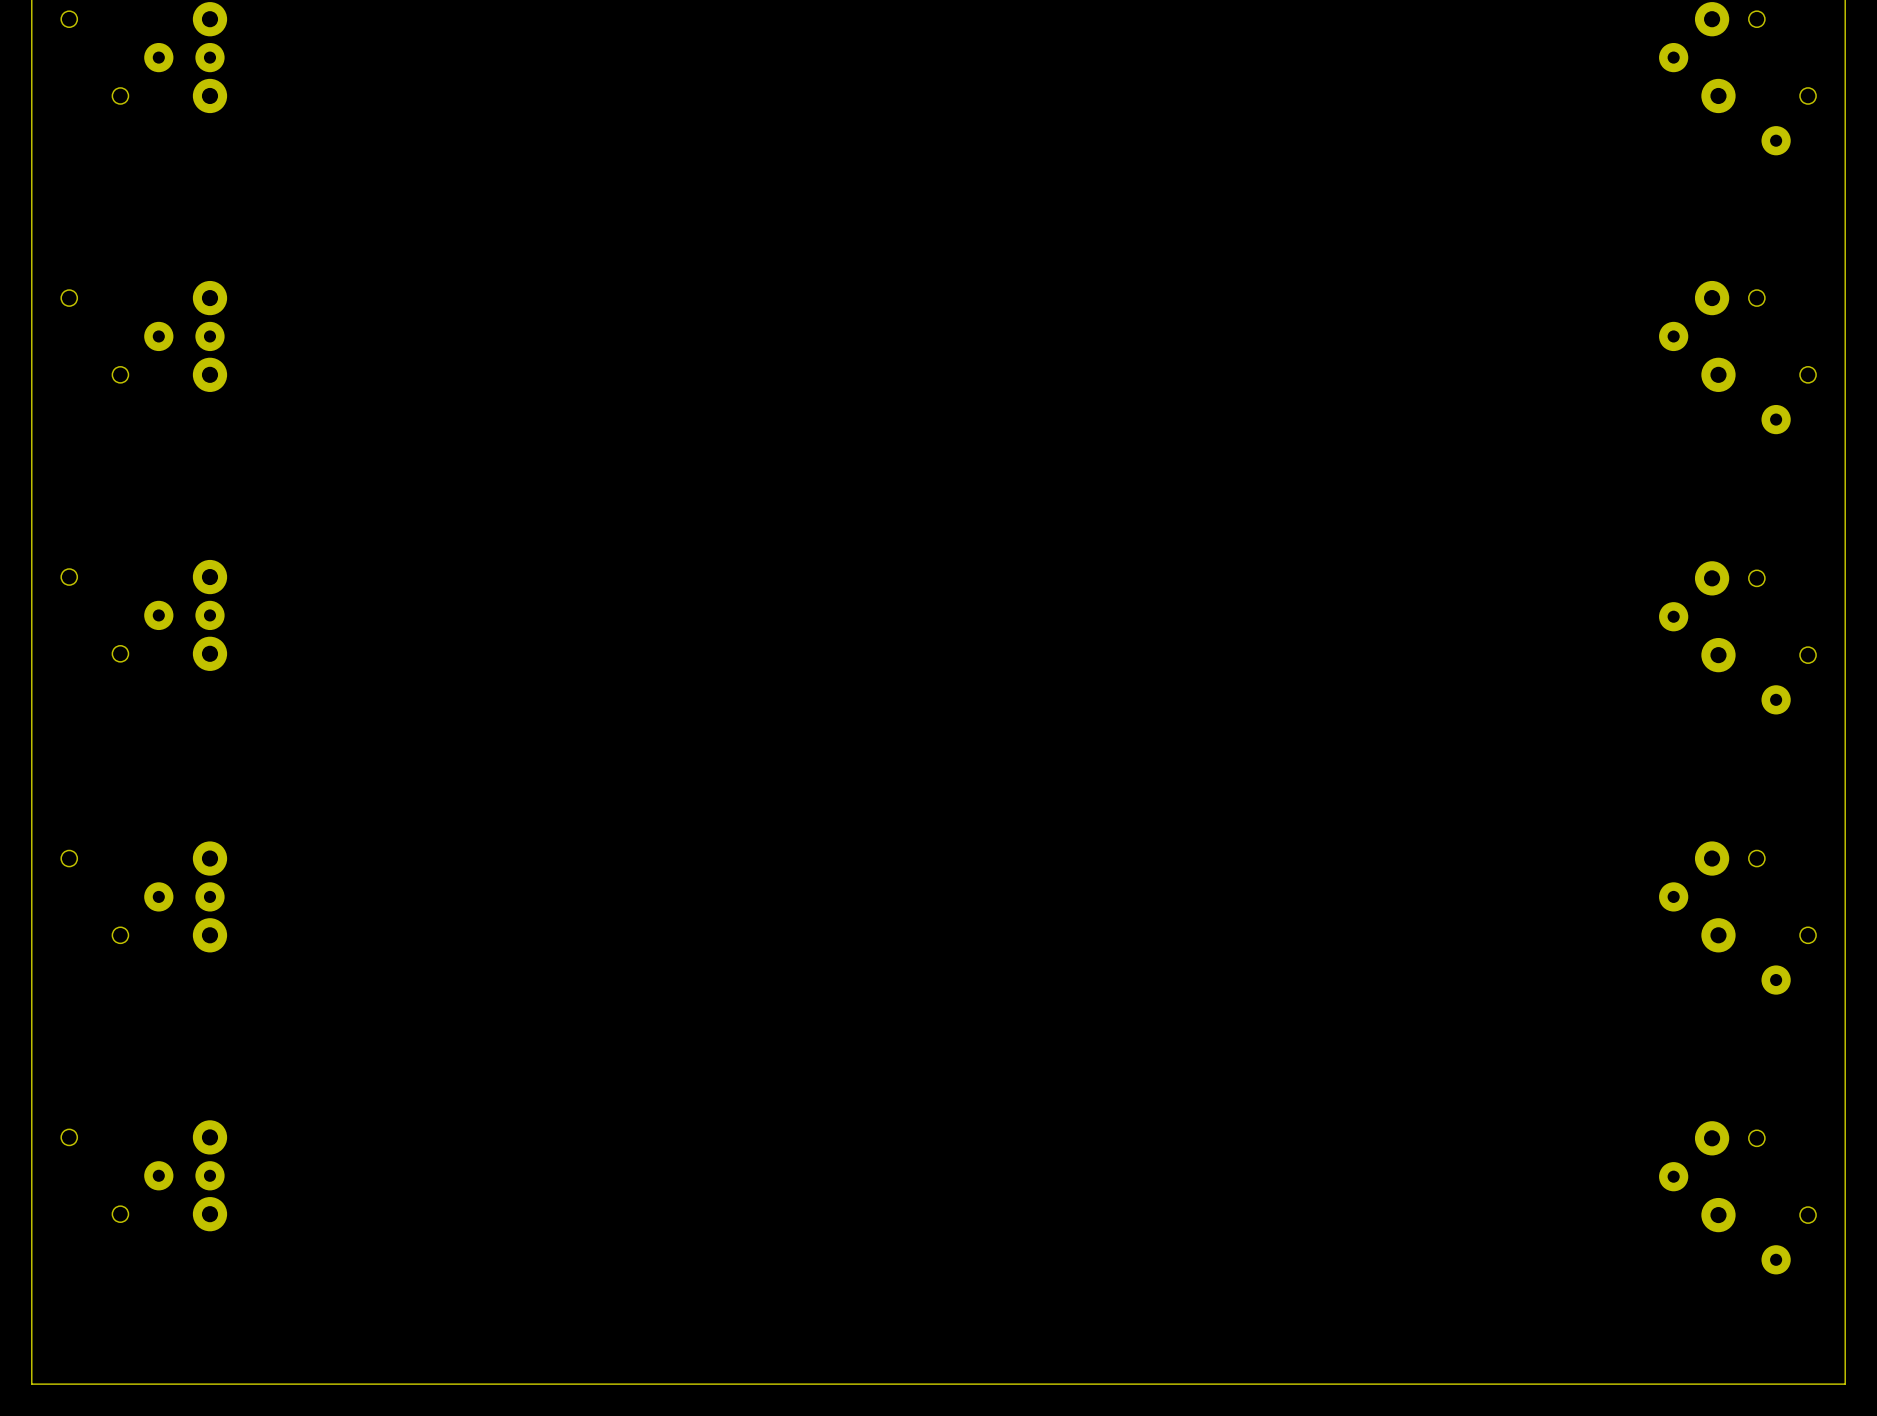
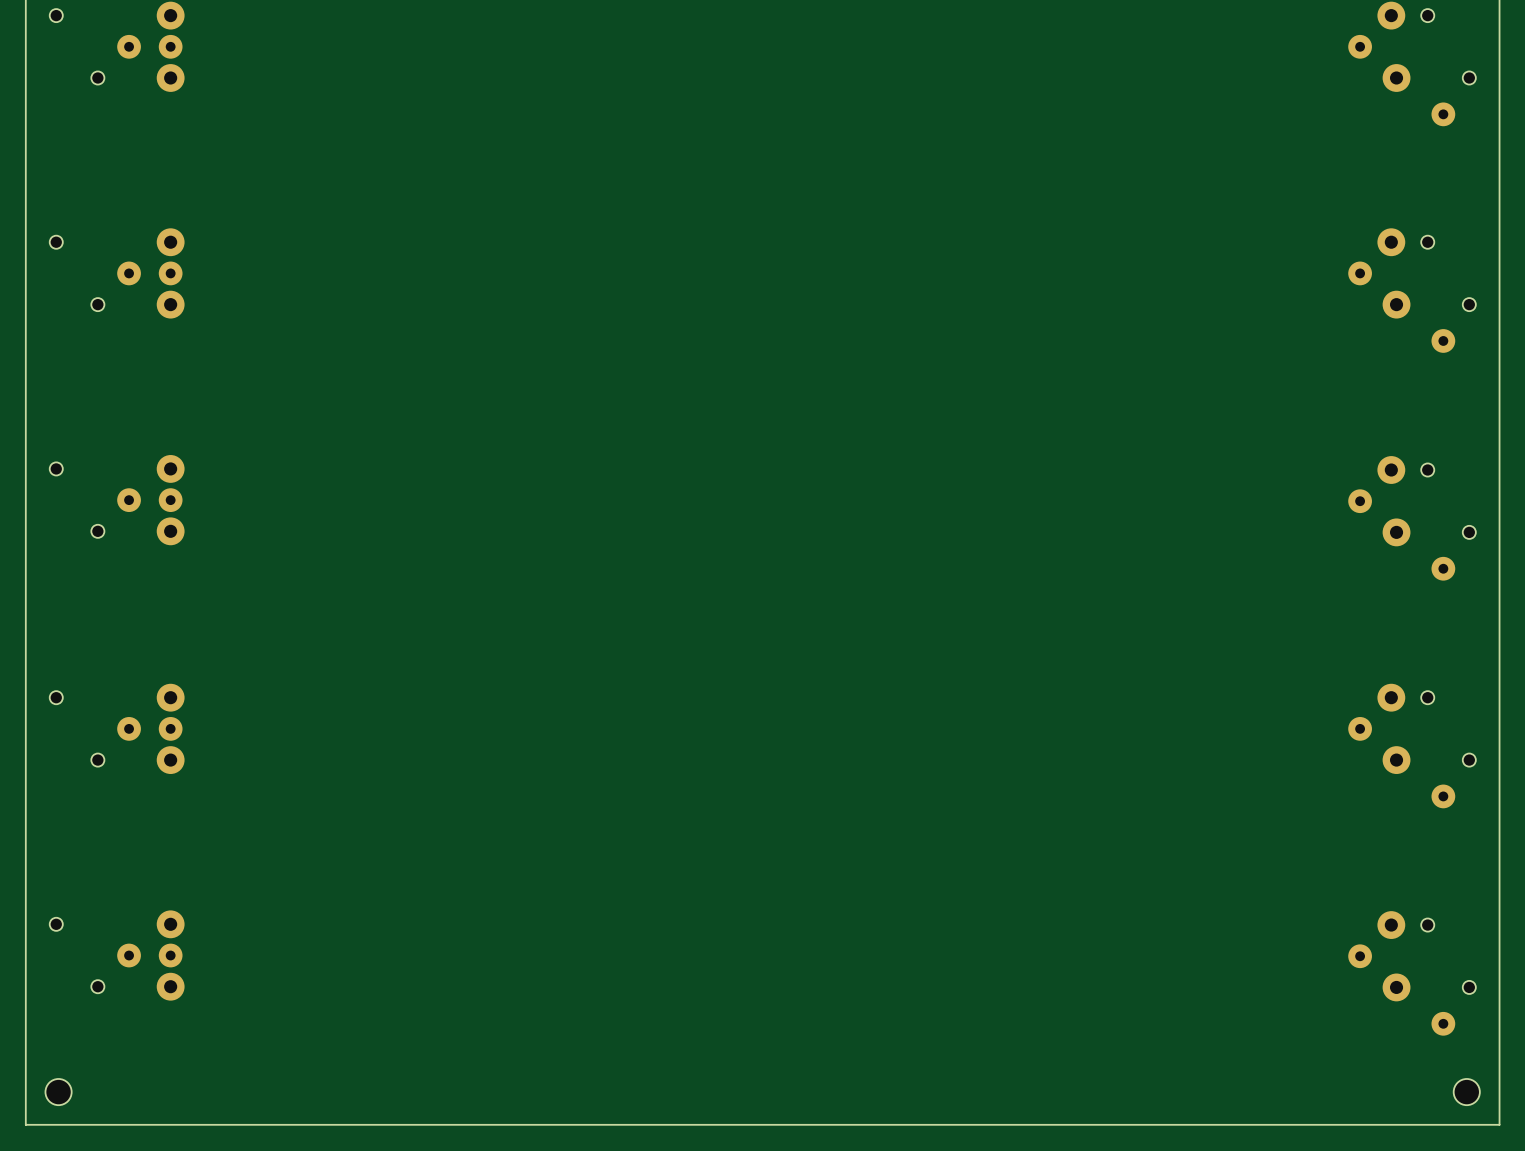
part: none -> (58, 1092)
part: none -> (1466, 1092)

